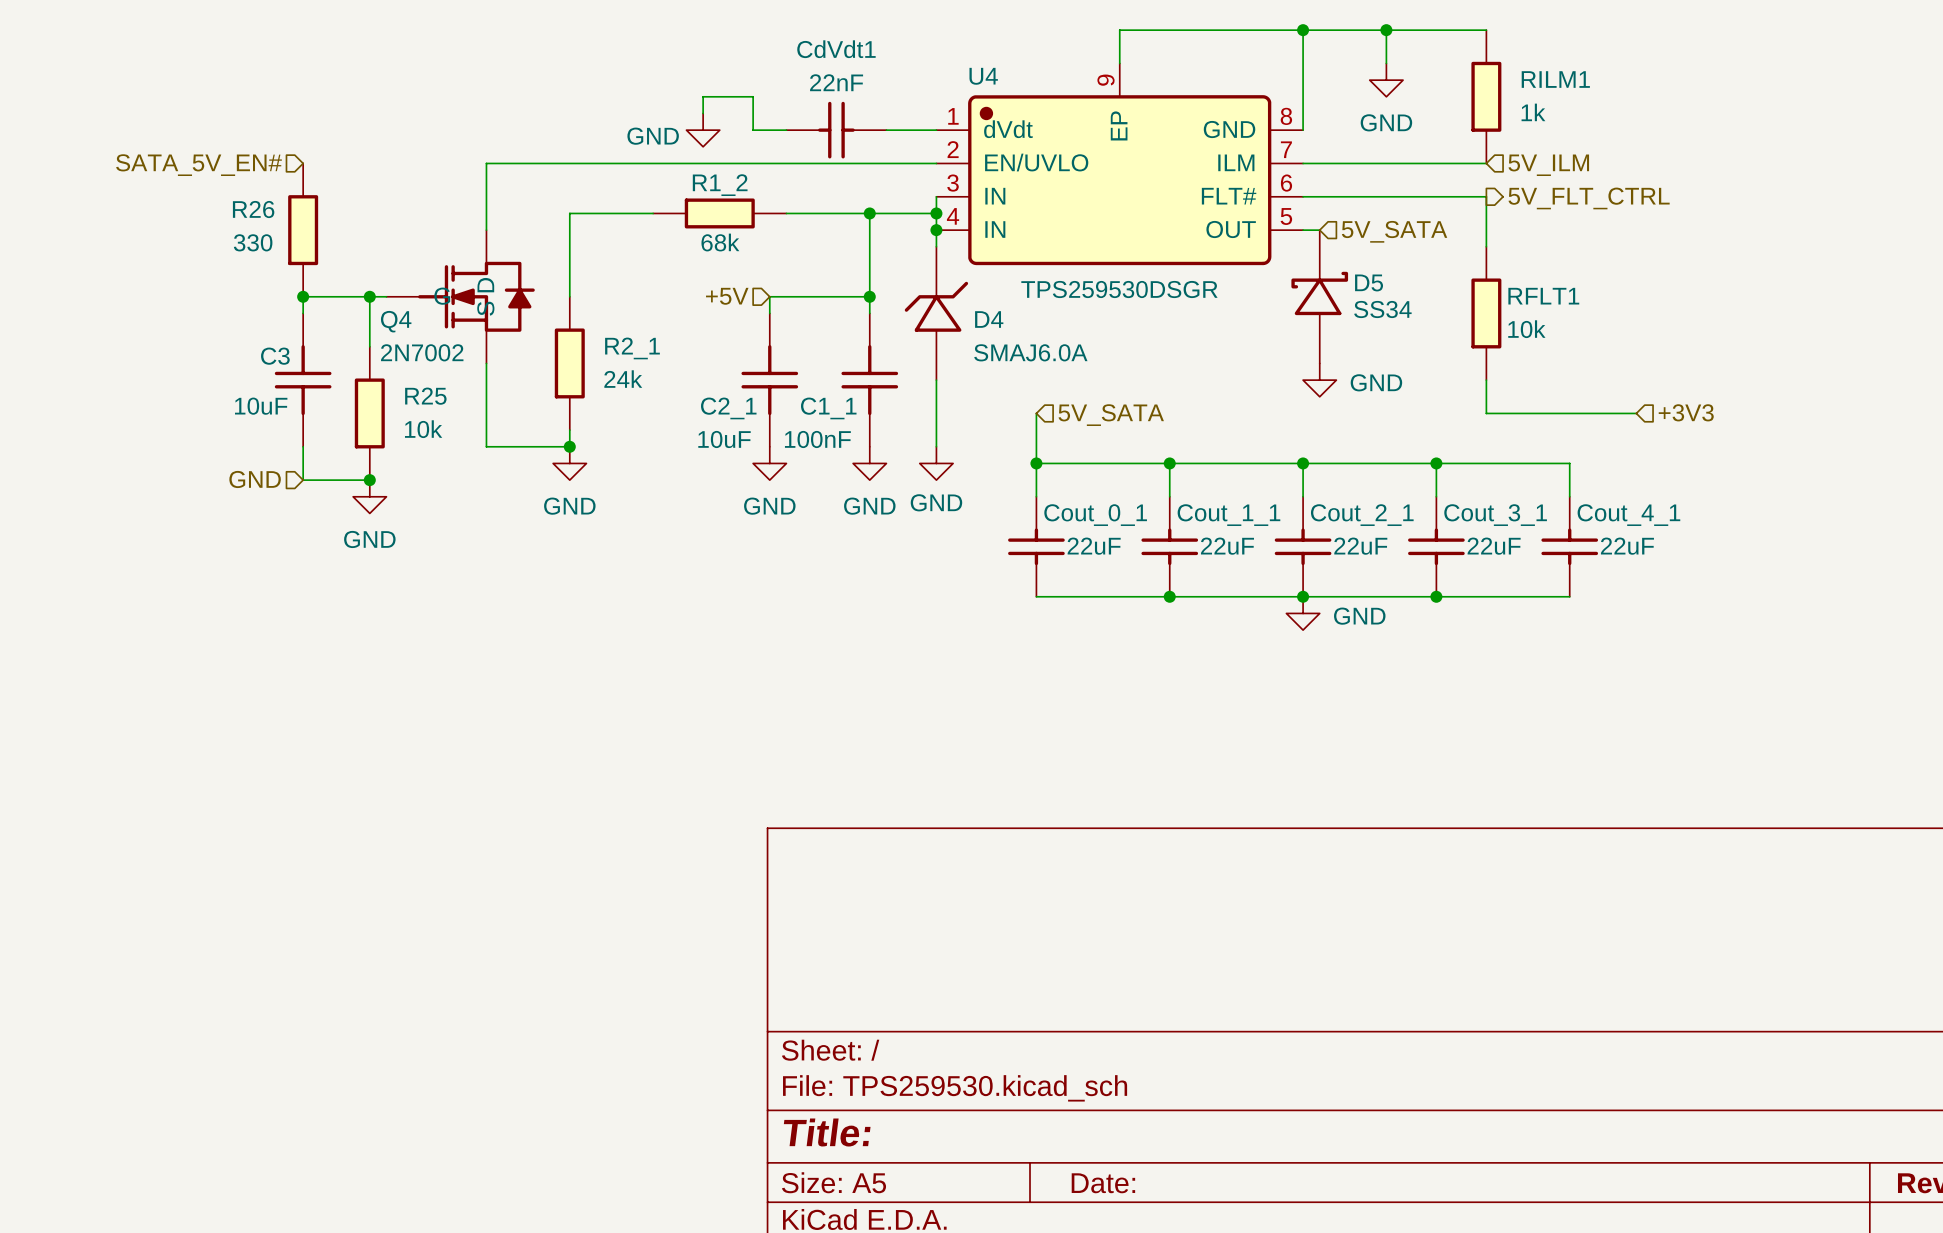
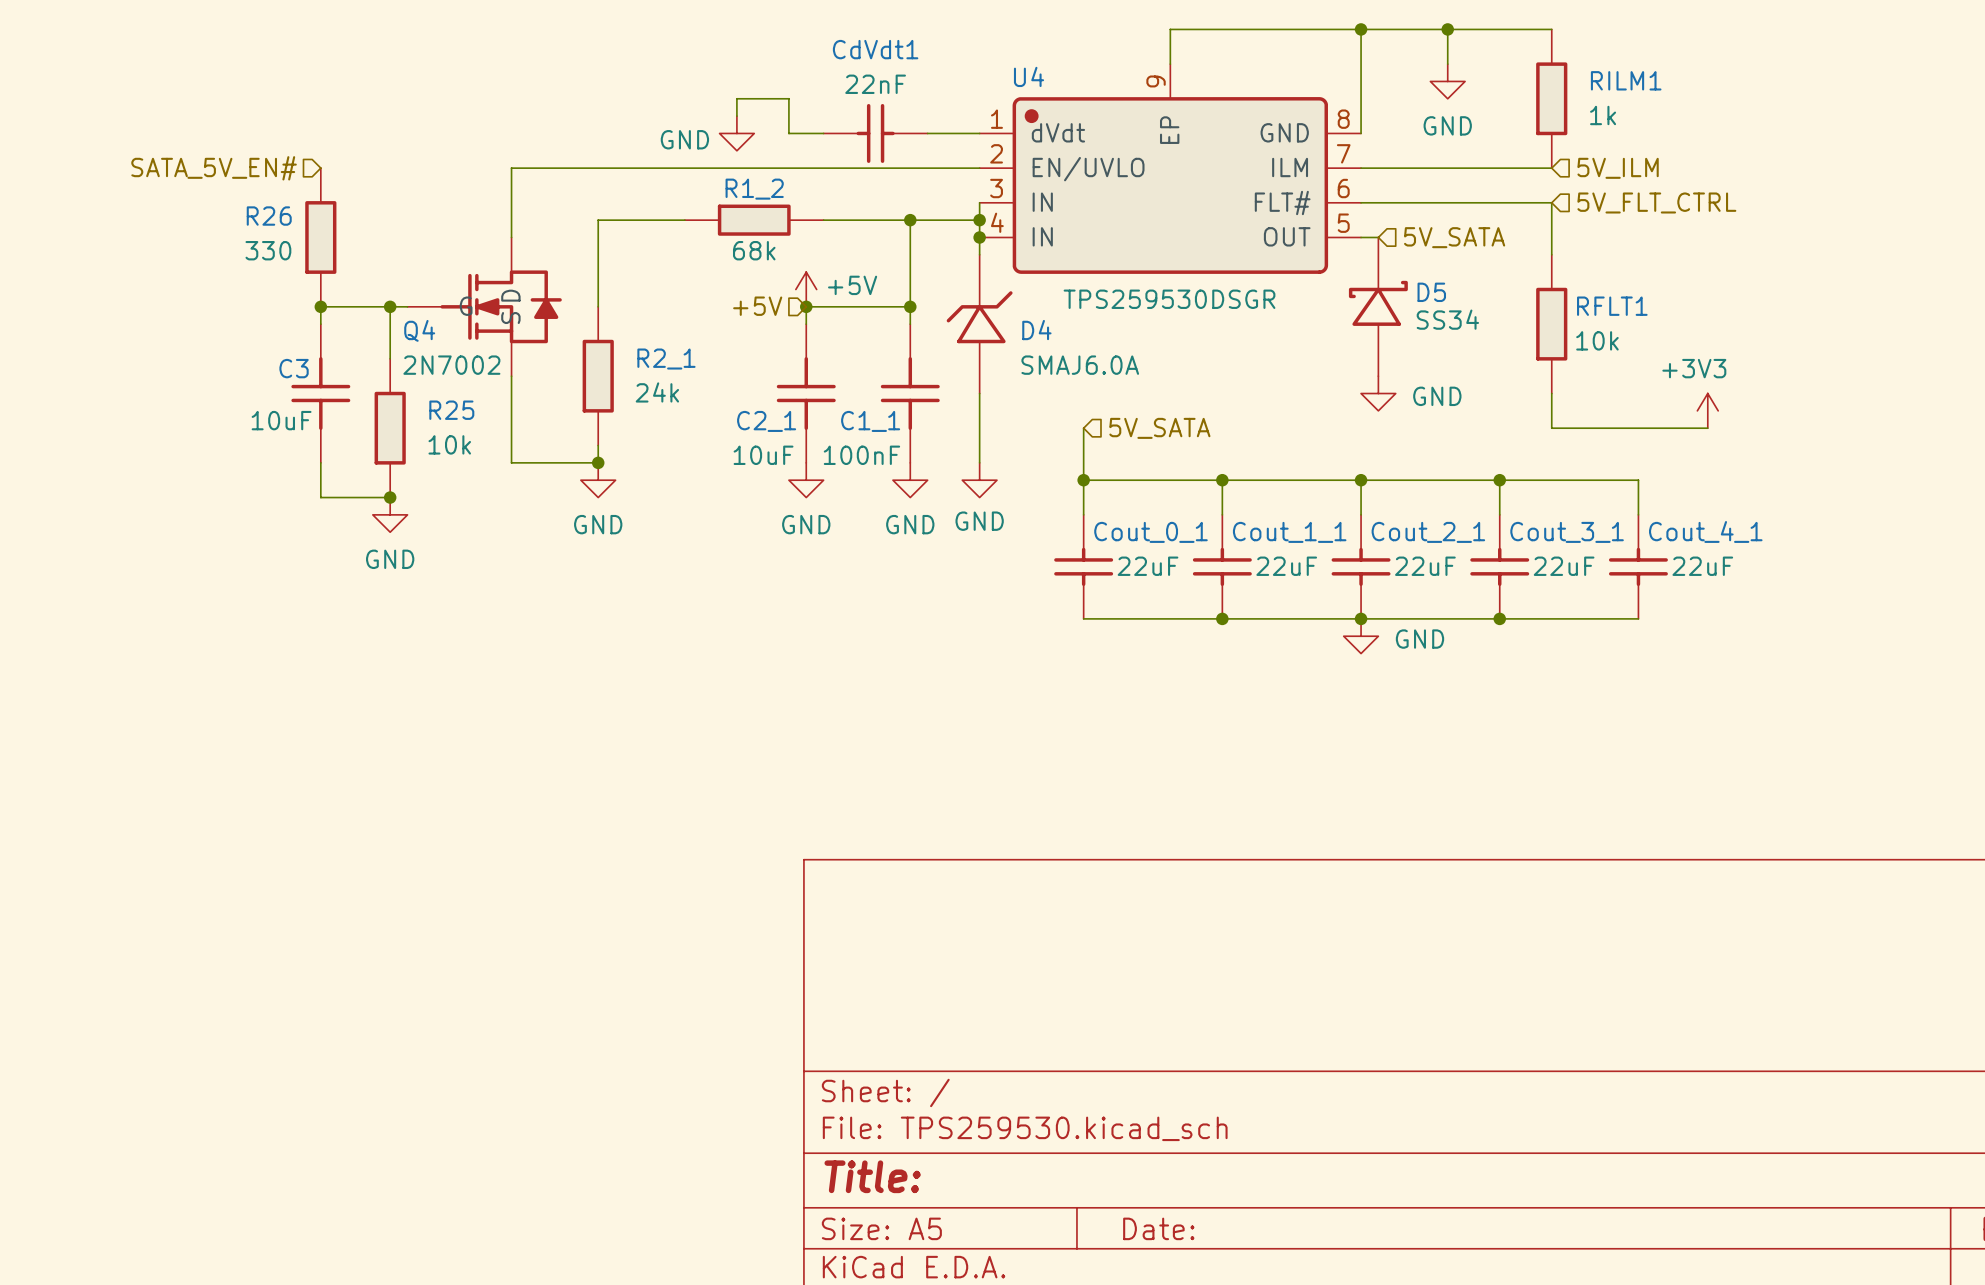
hierarchical label shape: output (1589, 198) -> input (1656, 202)
power symbol: none -> +5V (806, 289)
junction: none -> (806, 306)
power symbol: none -> +3V3 (1707, 410)
hierarchical label: +3V3 (1686, 412) -> none
hierarchical label: GND (255, 479) -> none

